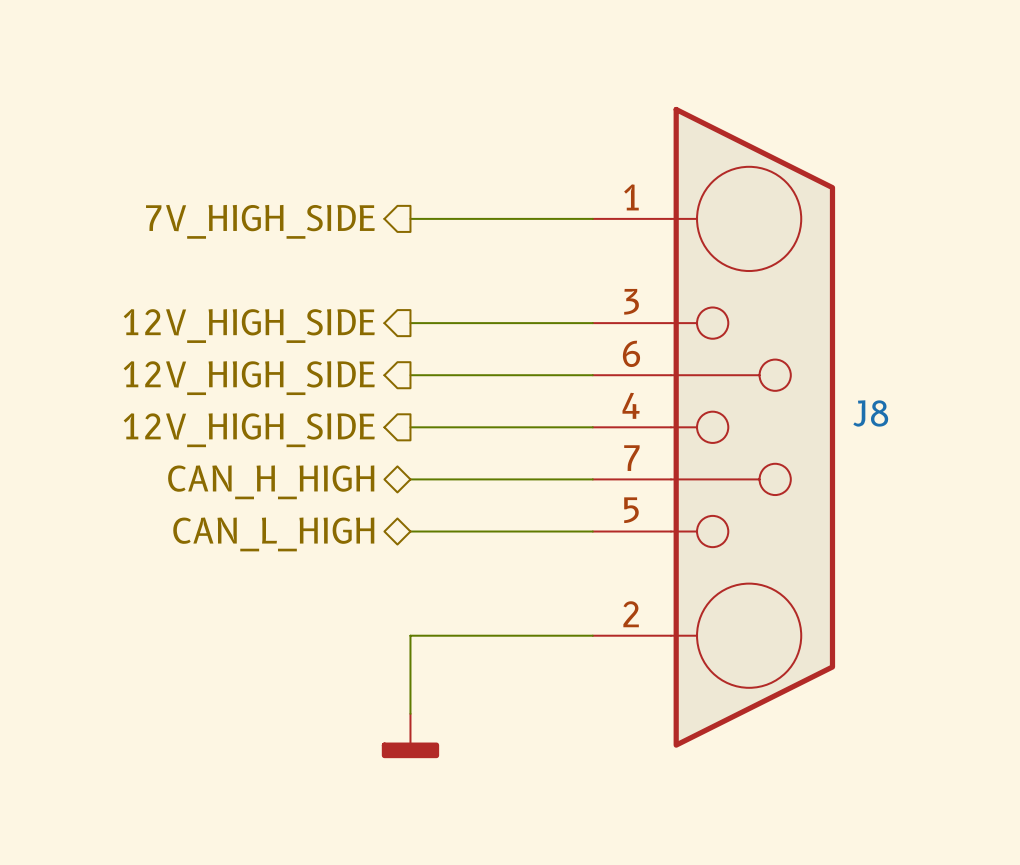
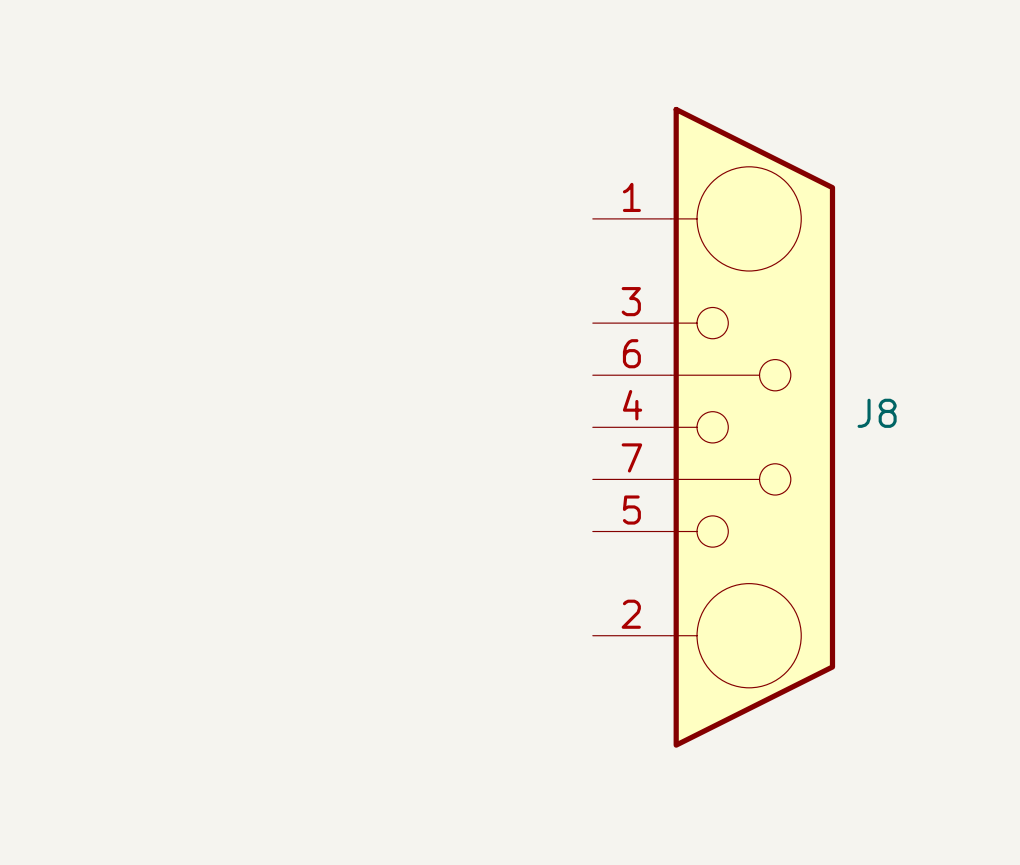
wire: (410, 218) (592, 218) -> none
hierarchical label: 7V_HIGH_SIDE (260, 221) -> none
wire: (410, 323) (592, 323) -> none
hierarchical label: 12V_HIGH_SIDE (249, 326) -> none
wire: (410, 375) (592, 375) -> none
hierarchical label: 12V_HIGH_SIDE (249, 378) -> none
wire: (410, 427) (592, 427) -> none
hierarchical label: 12V_HIGH_SIDE (249, 430) -> none
wire: (410, 479) (592, 479) -> none
hierarchical label: CAN_H_HIGH (271, 482) -> none
wire: (410, 531) (592, 531) -> none
hierarchical label: CAN_L_HIGH (273, 534) -> none
wire: (592, 635) (410, 635) (410, 713) -> none
power symbol: (410, 736) -> none

